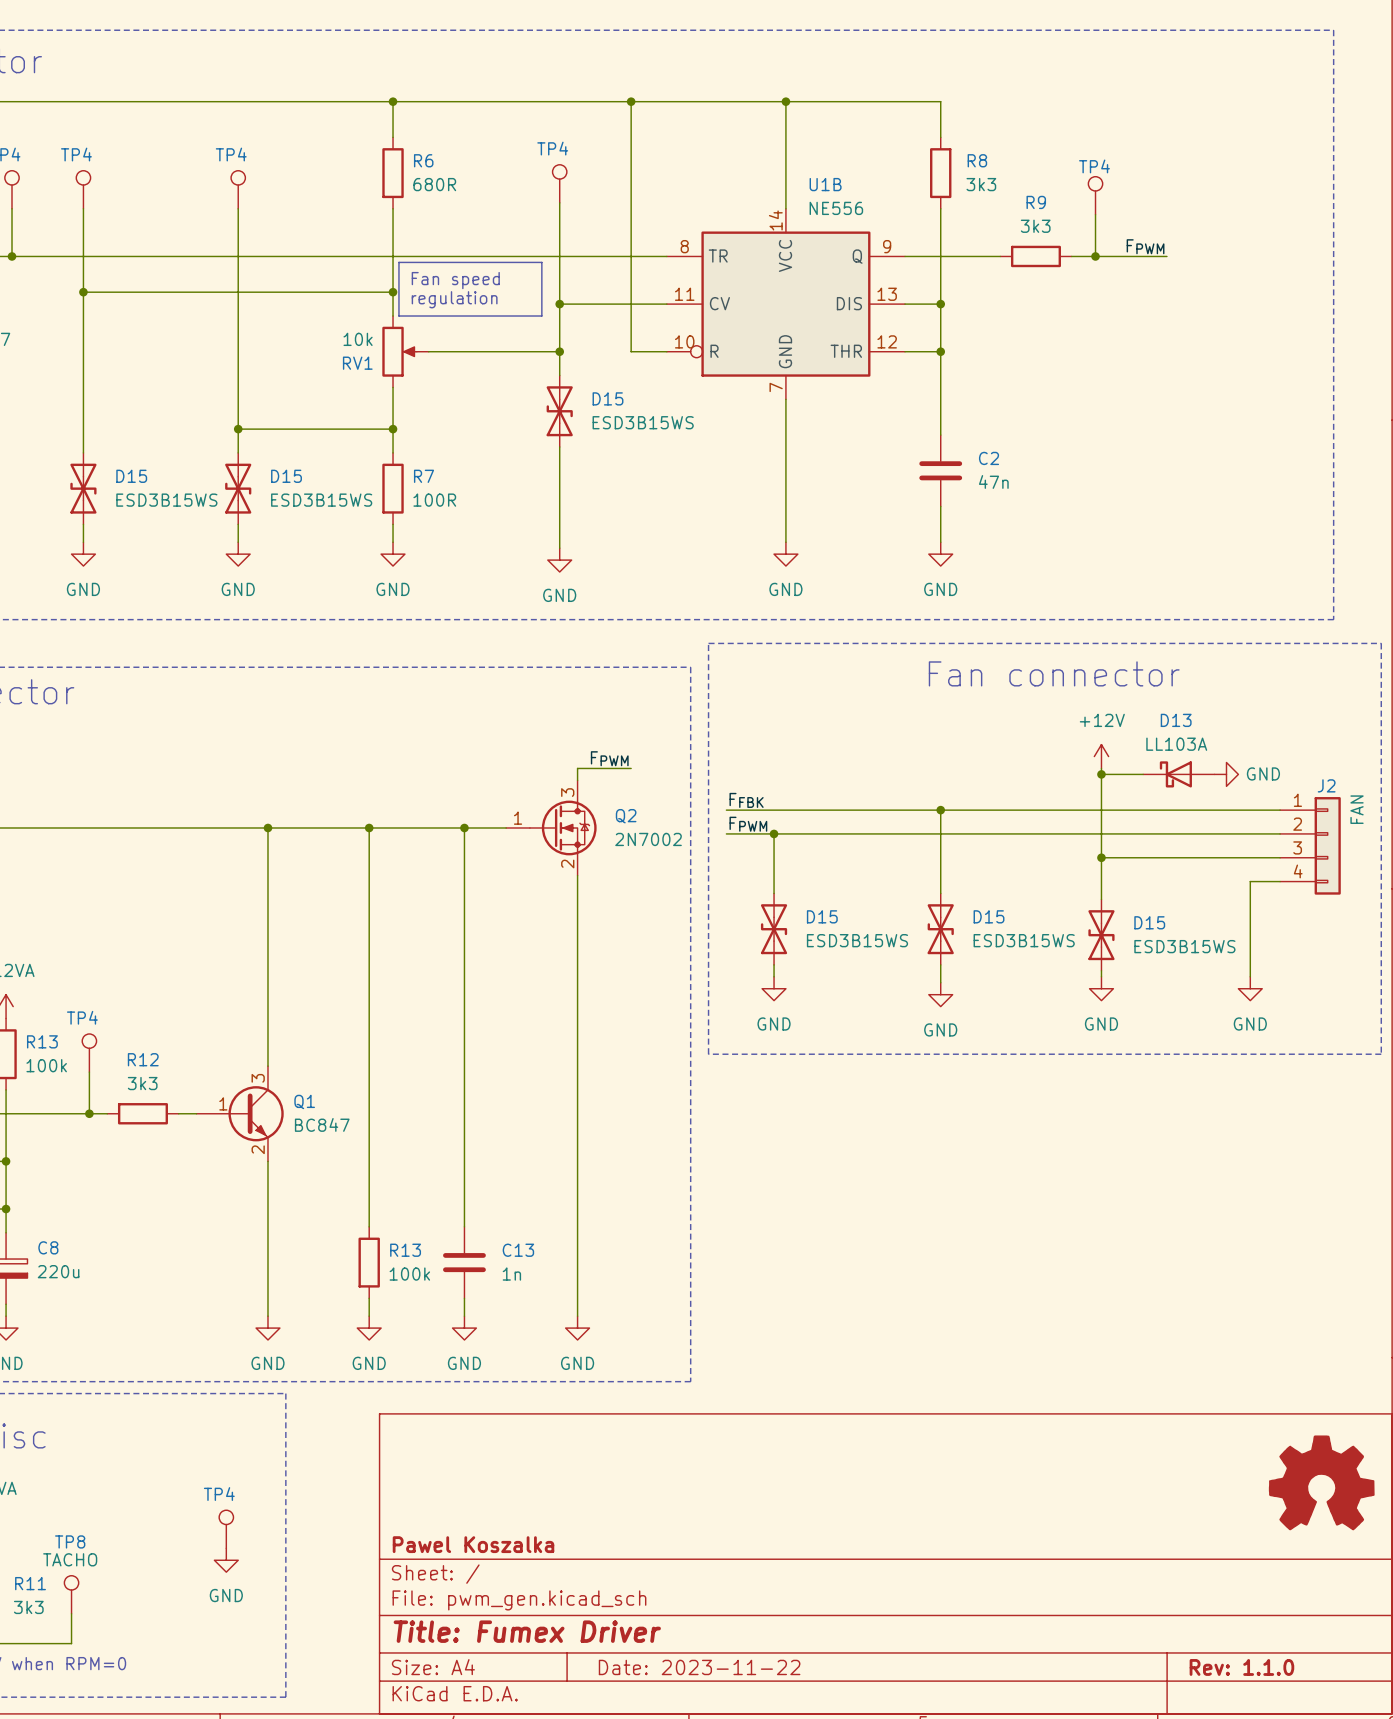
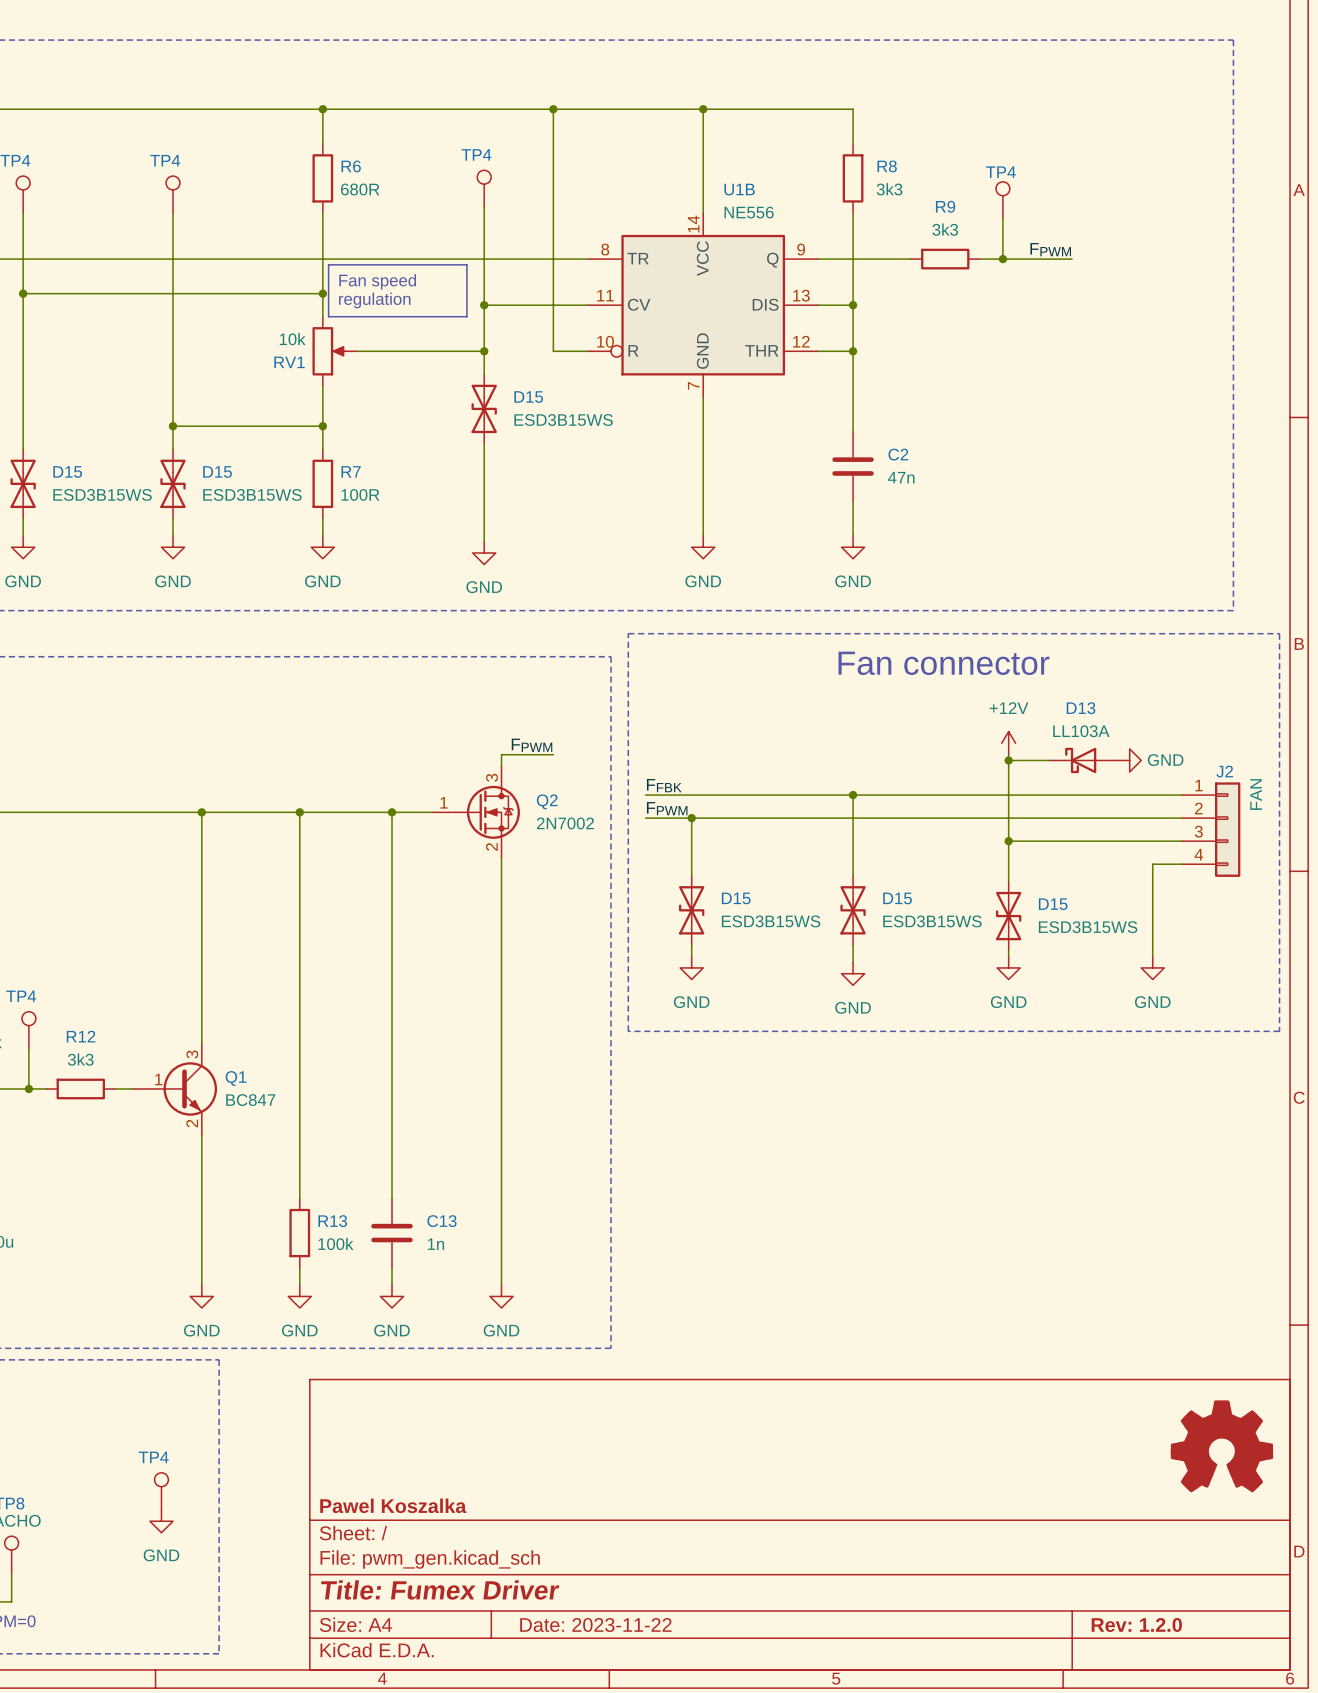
title block: Rev: 1.1.0 (1241, 1667) -> Rev: 1.2.0 (1136, 1624)

